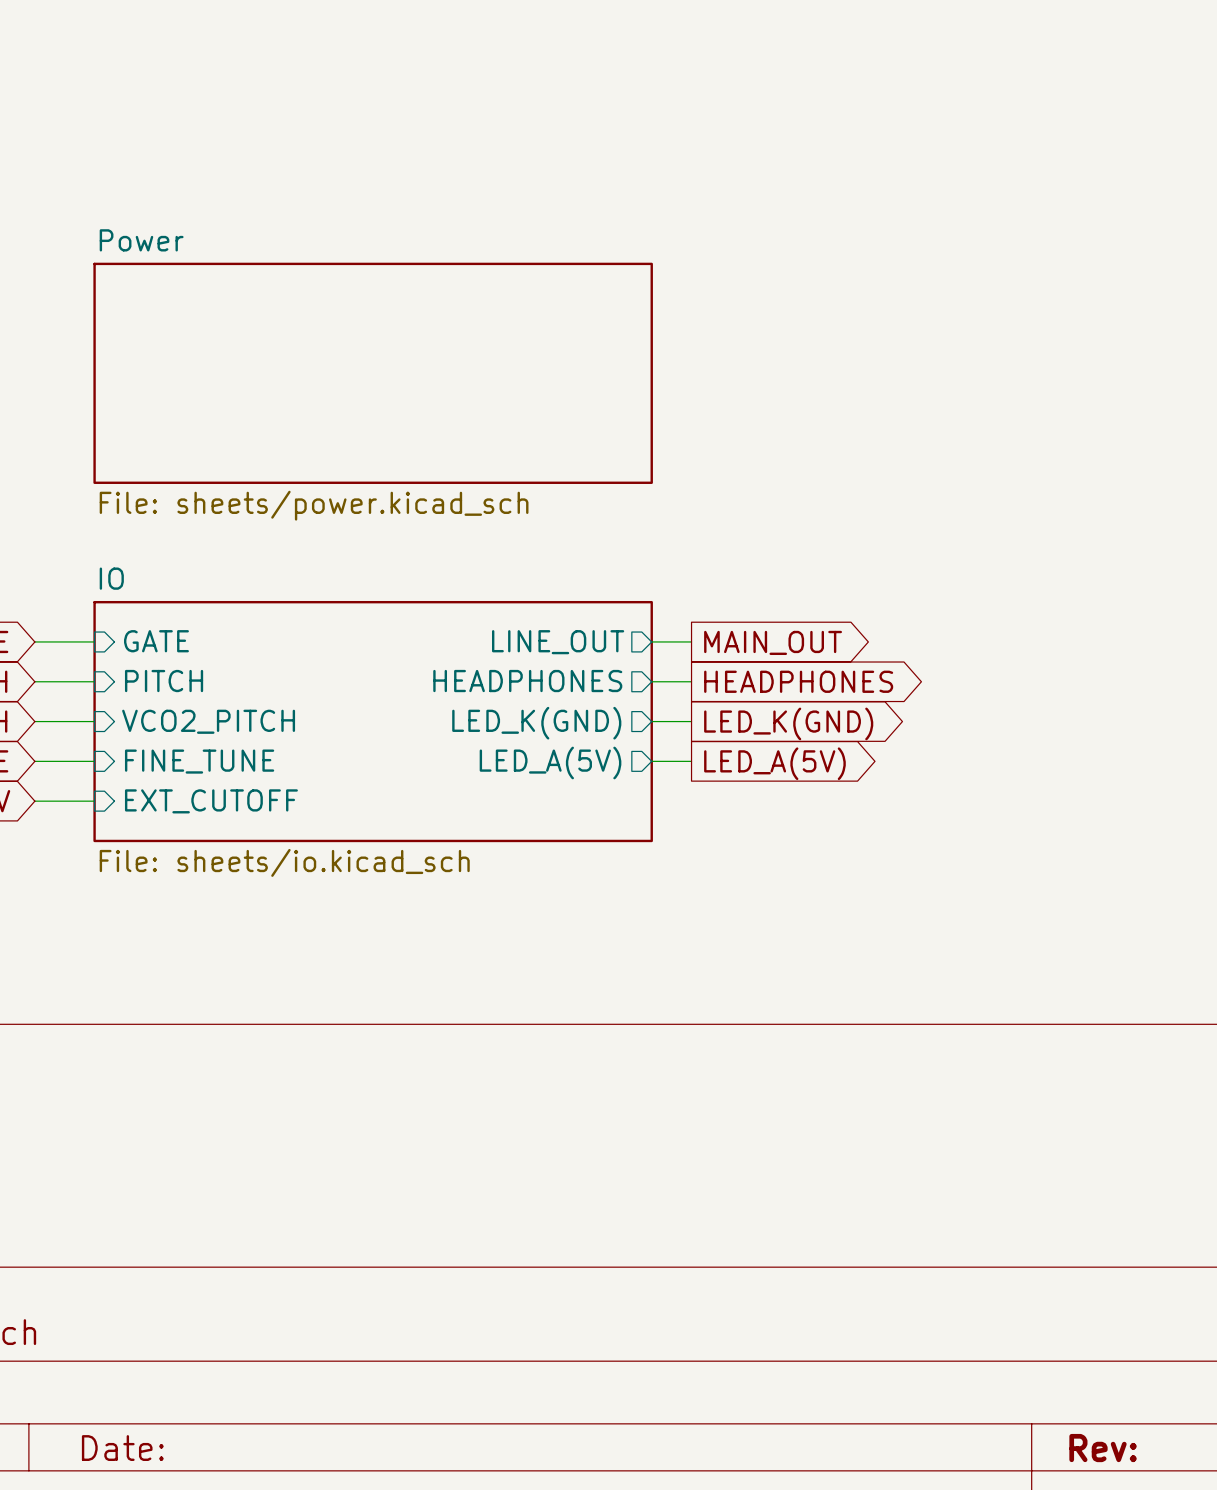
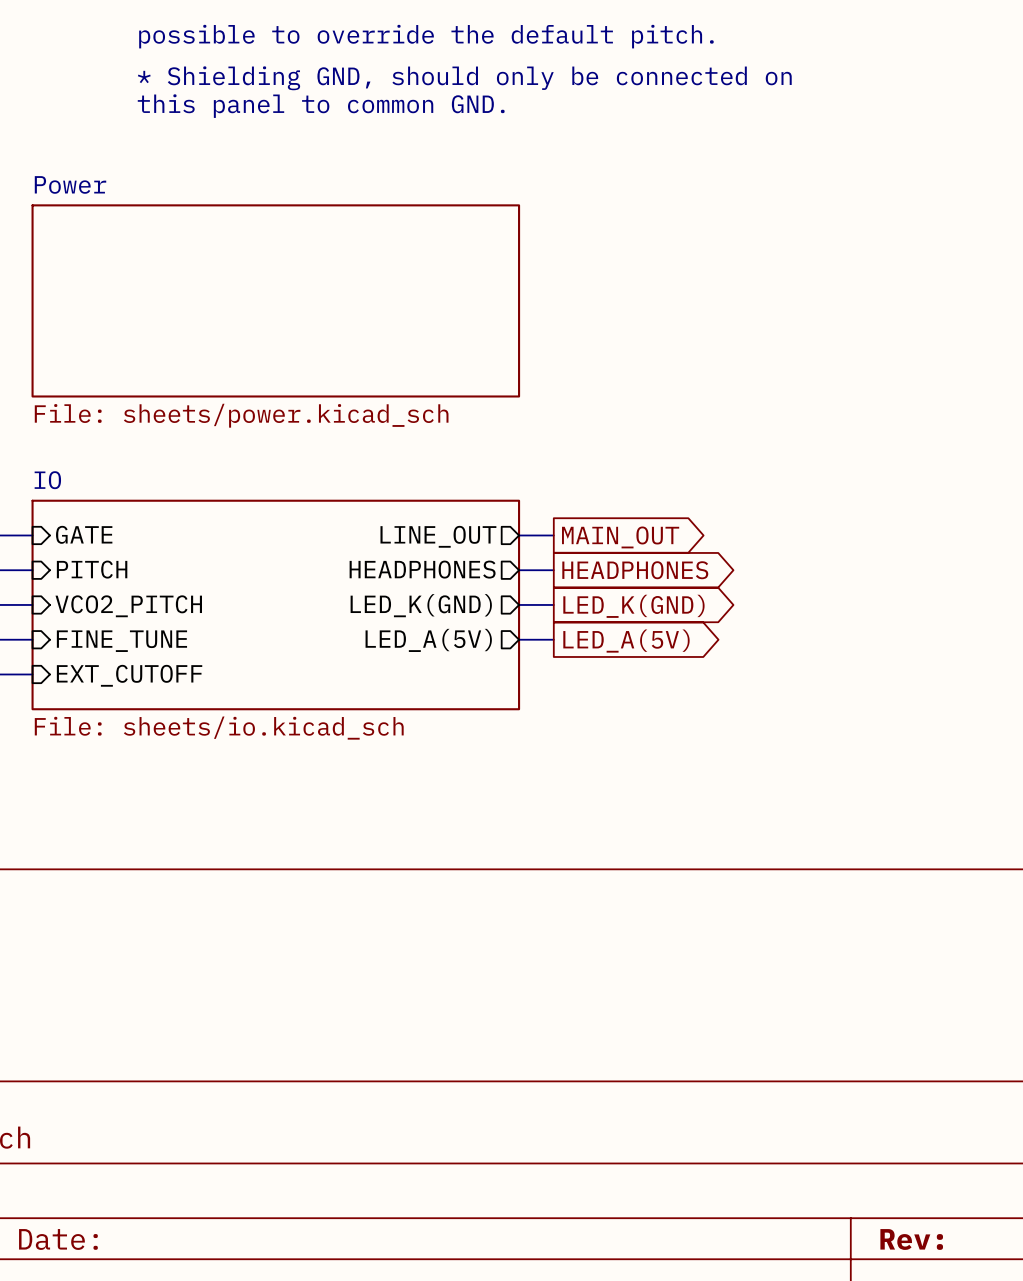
text: none -> possible to override the default pitch. (426, 36)
text: none -> * Shielding GND, should only be connected on (464, 78)
text: none -> this panel to common GND. (321, 106)

